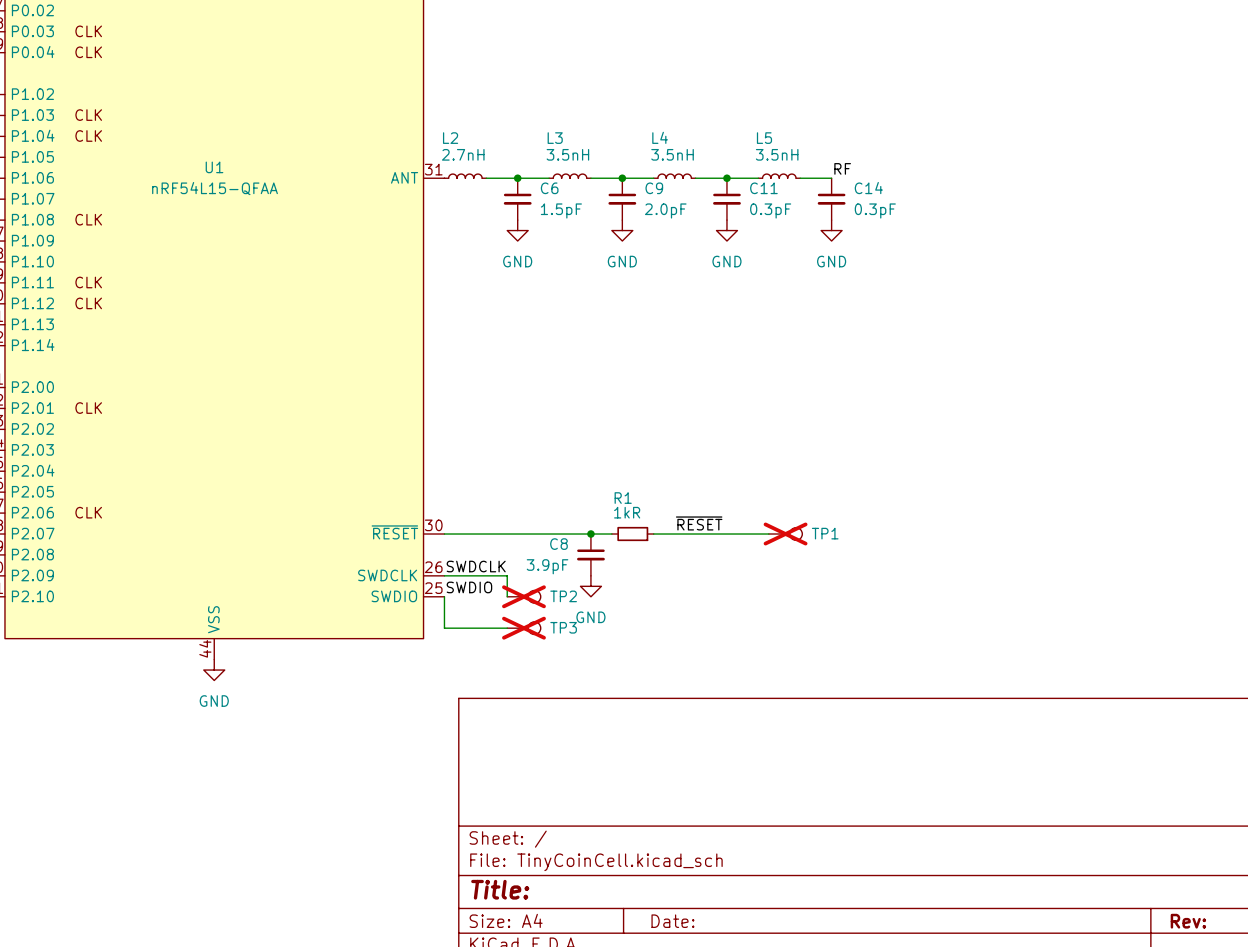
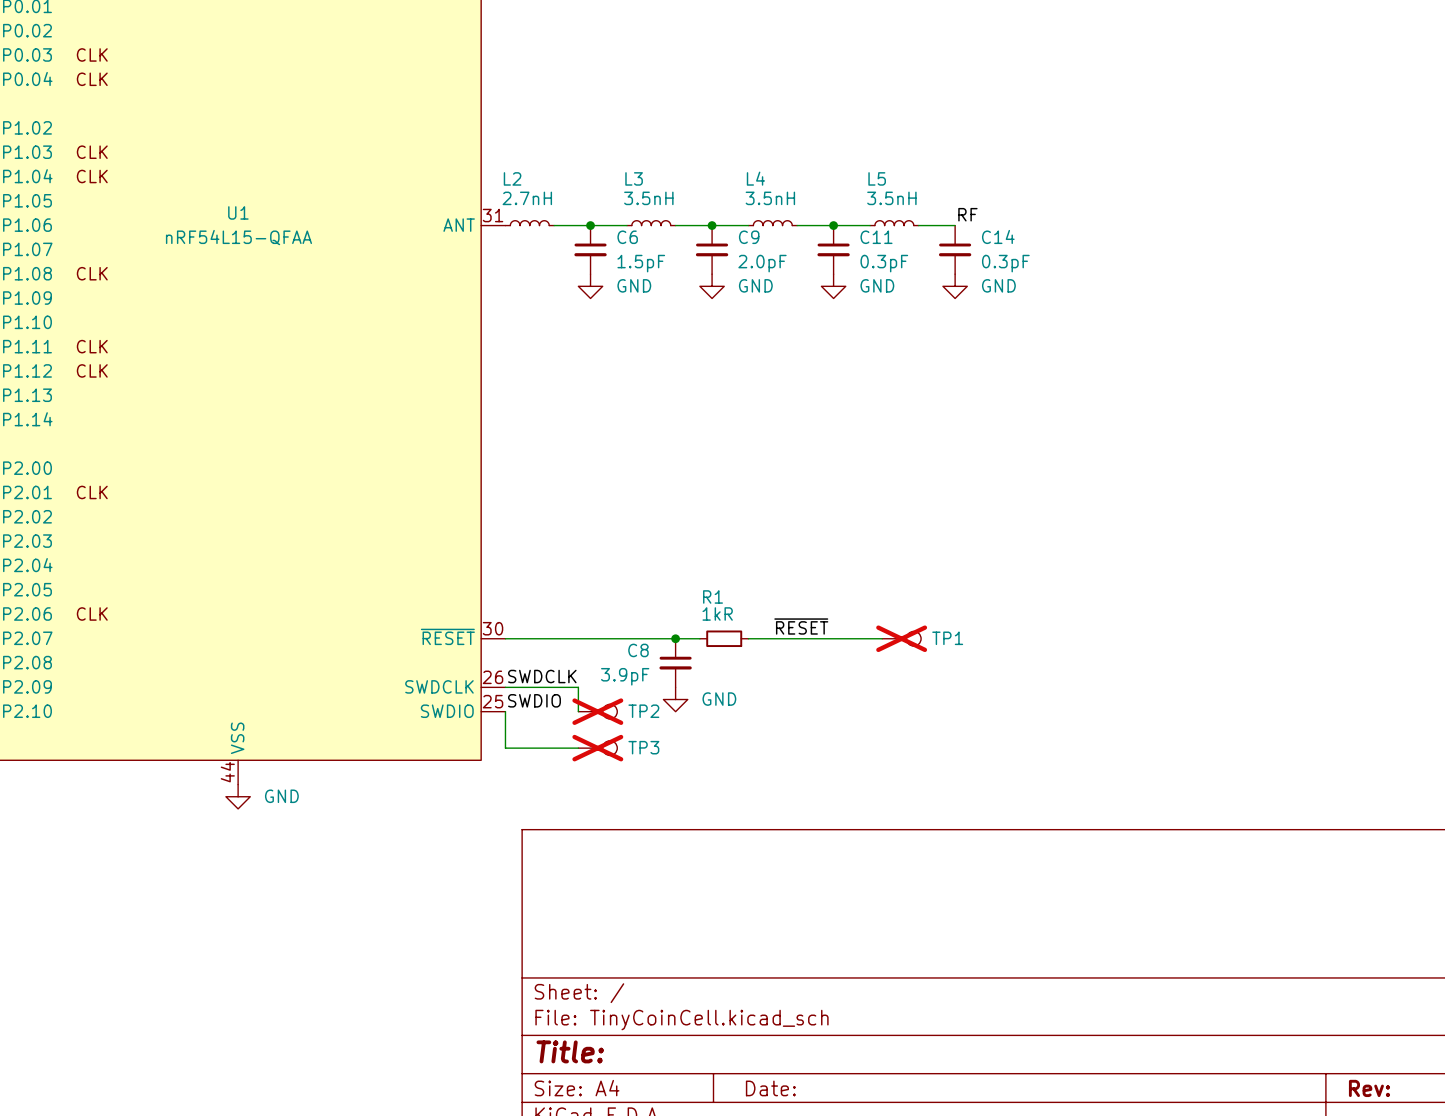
power symbol text position: GND (517, 261) -> GND (634, 285)
power symbol text position: GND (622, 261) -> GND (755, 285)
power symbol text position: GND (726, 261) -> GND (877, 285)
power symbol text position: GND (831, 261) -> GND (998, 285)
power symbol text position: GND (590, 617) -> GND (719, 699)
power symbol text position: GND (214, 701) -> GND (281, 796)

